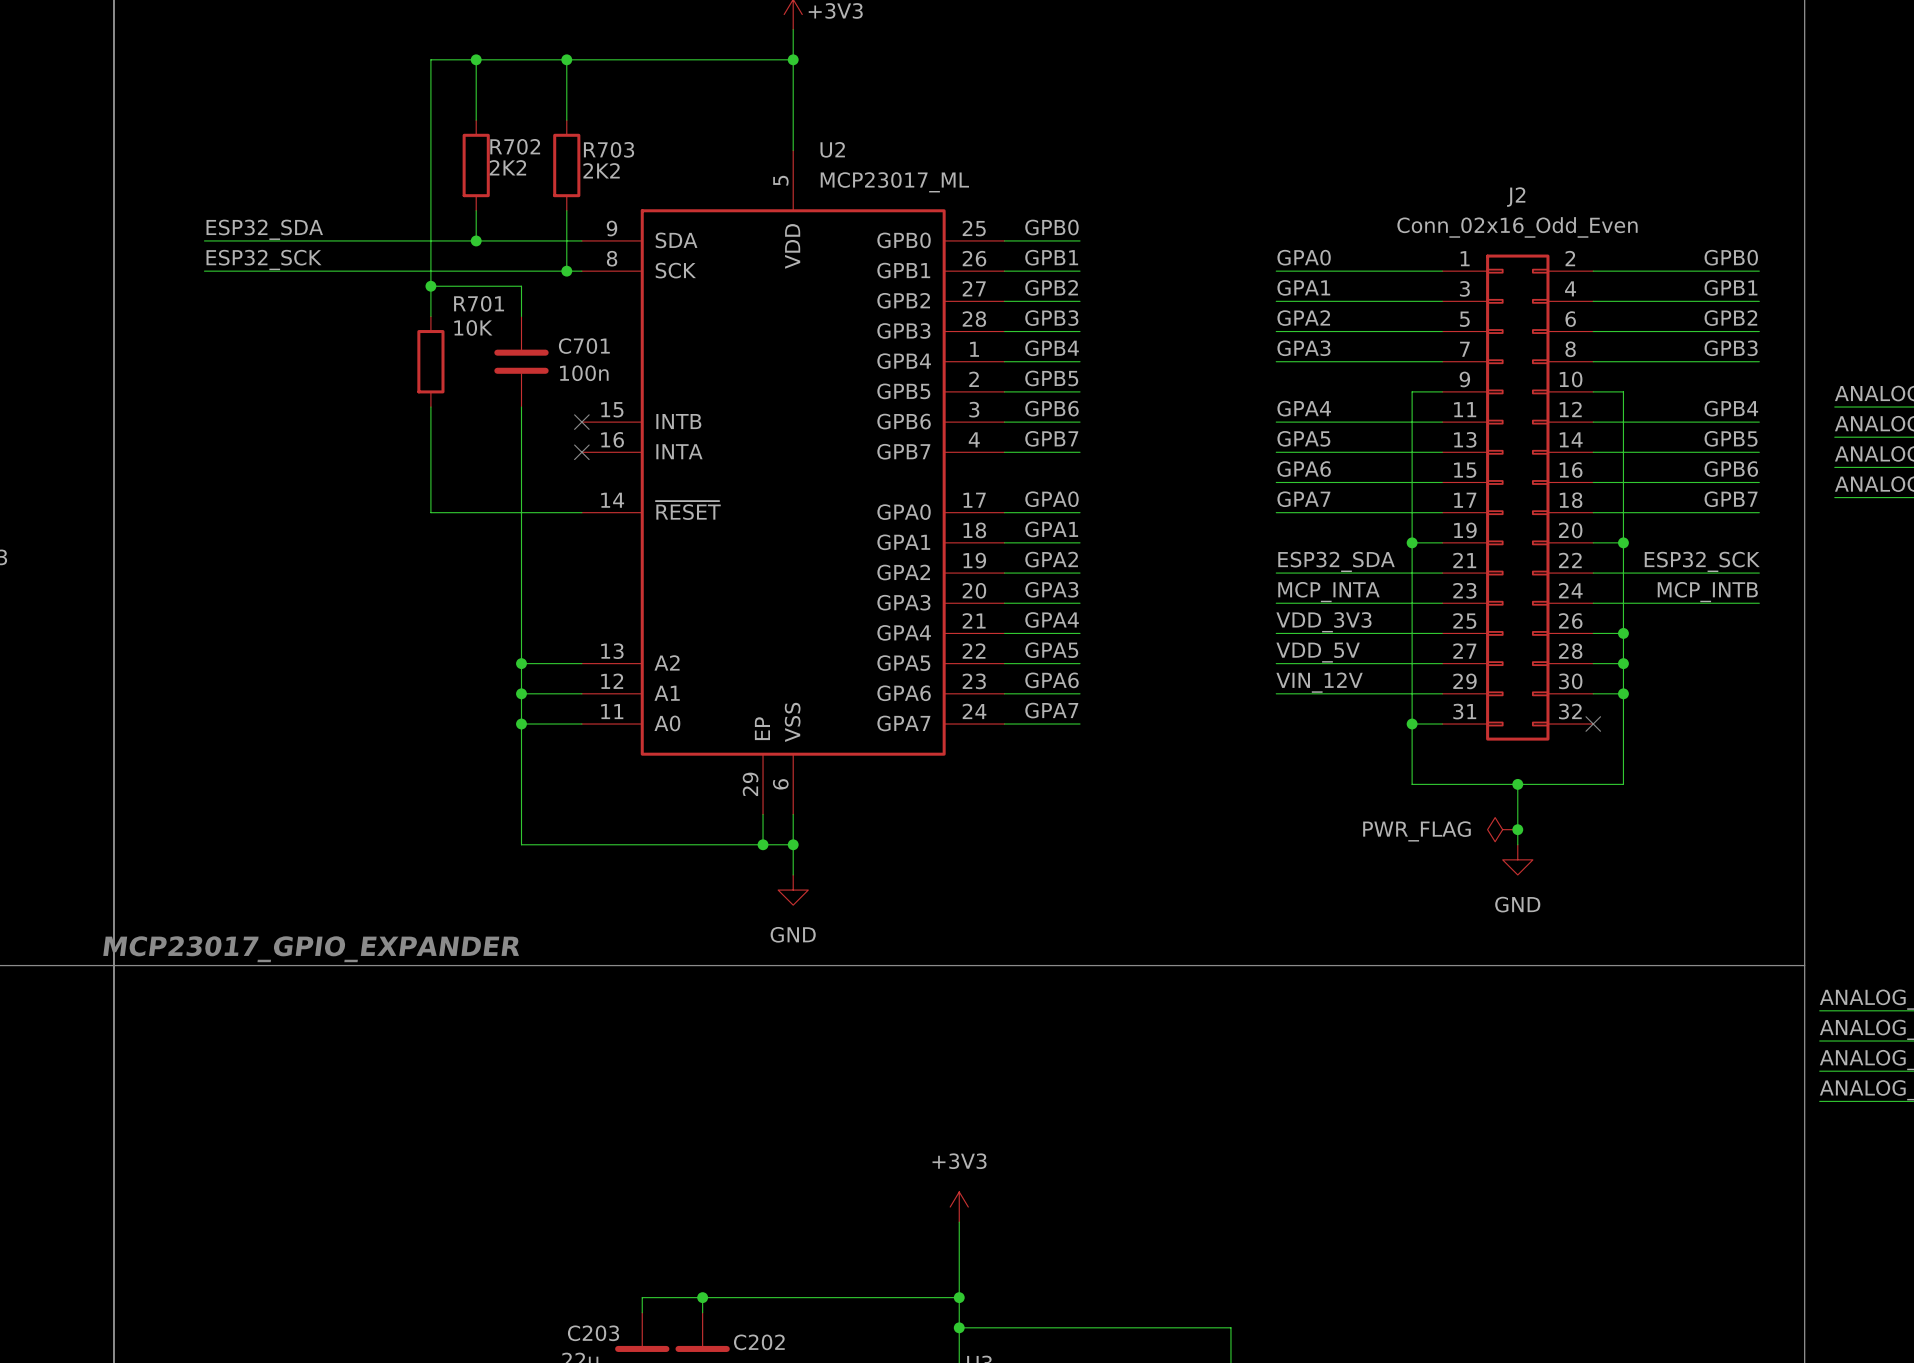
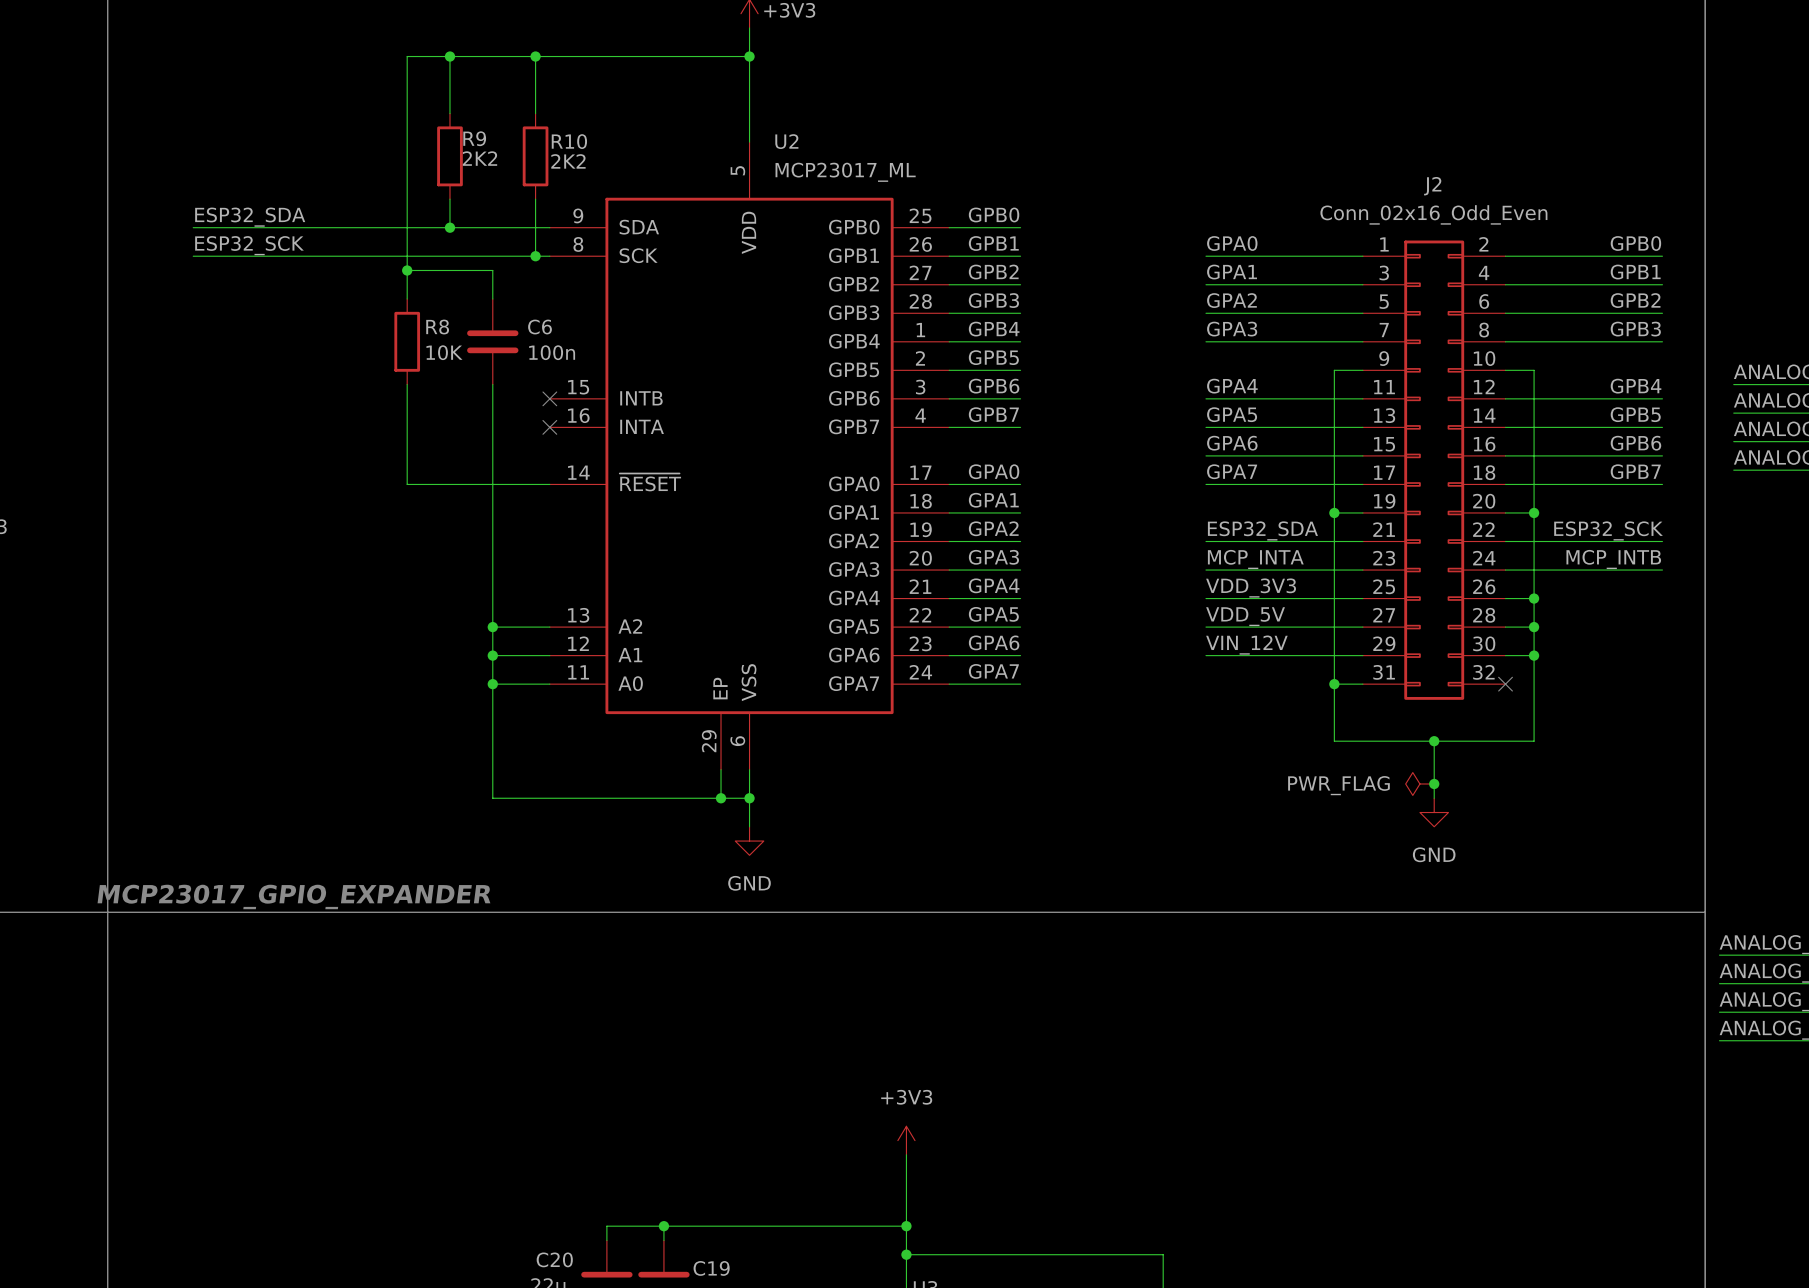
R702 name: R702 (515, 146) -> R9 (474, 138)
R703 name: R703 (609, 149) -> R10 (569, 141)
R701 name: R701 (479, 303) -> R8 (437, 327)
R701 value position: 10K (473, 327) -> 10K (444, 352)
C701 name: C701 (584, 346) -> C6 (540, 327)
C203 name: C203 (593, 1333) -> C20 (554, 1259)
C202 name: C202 (759, 1342) -> C19 (711, 1268)

